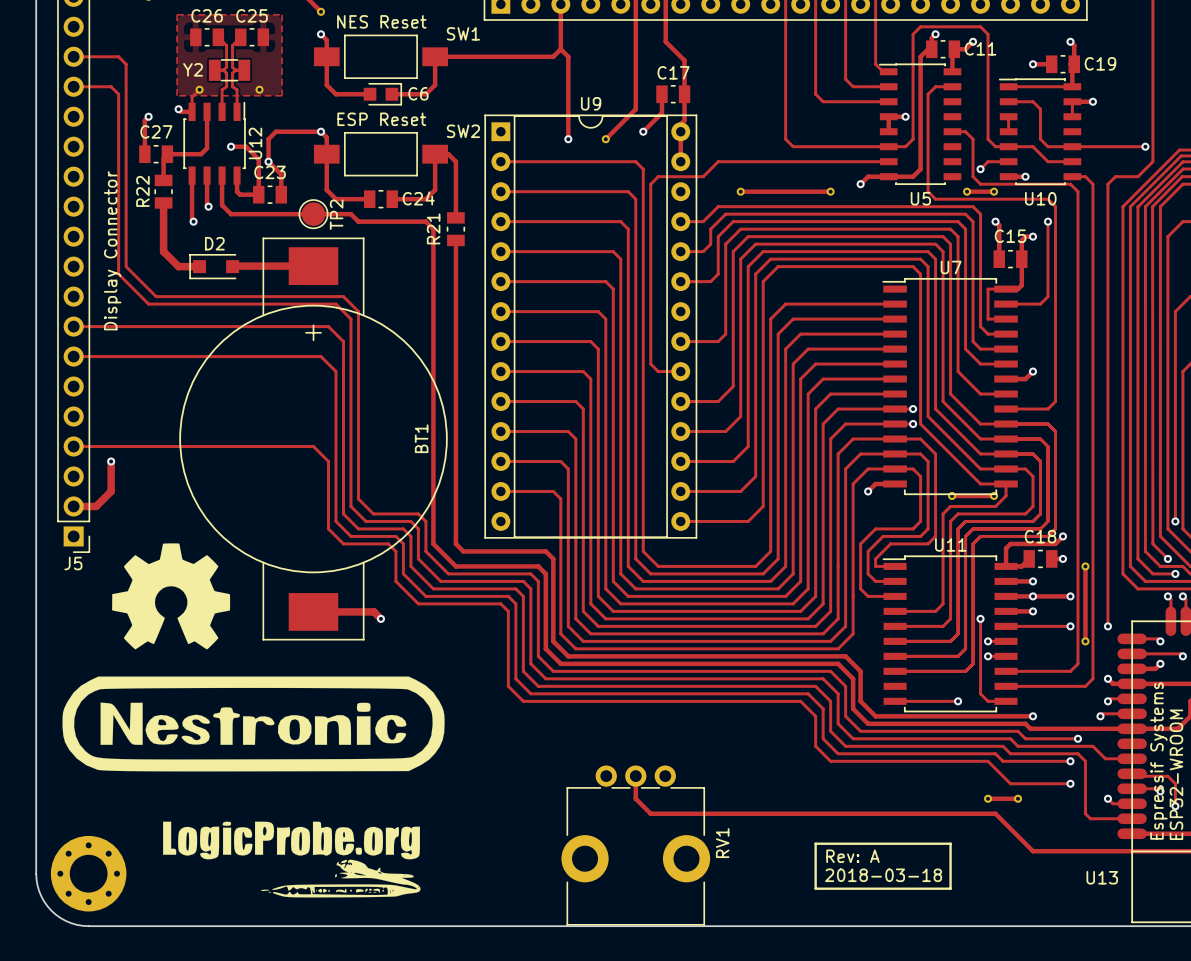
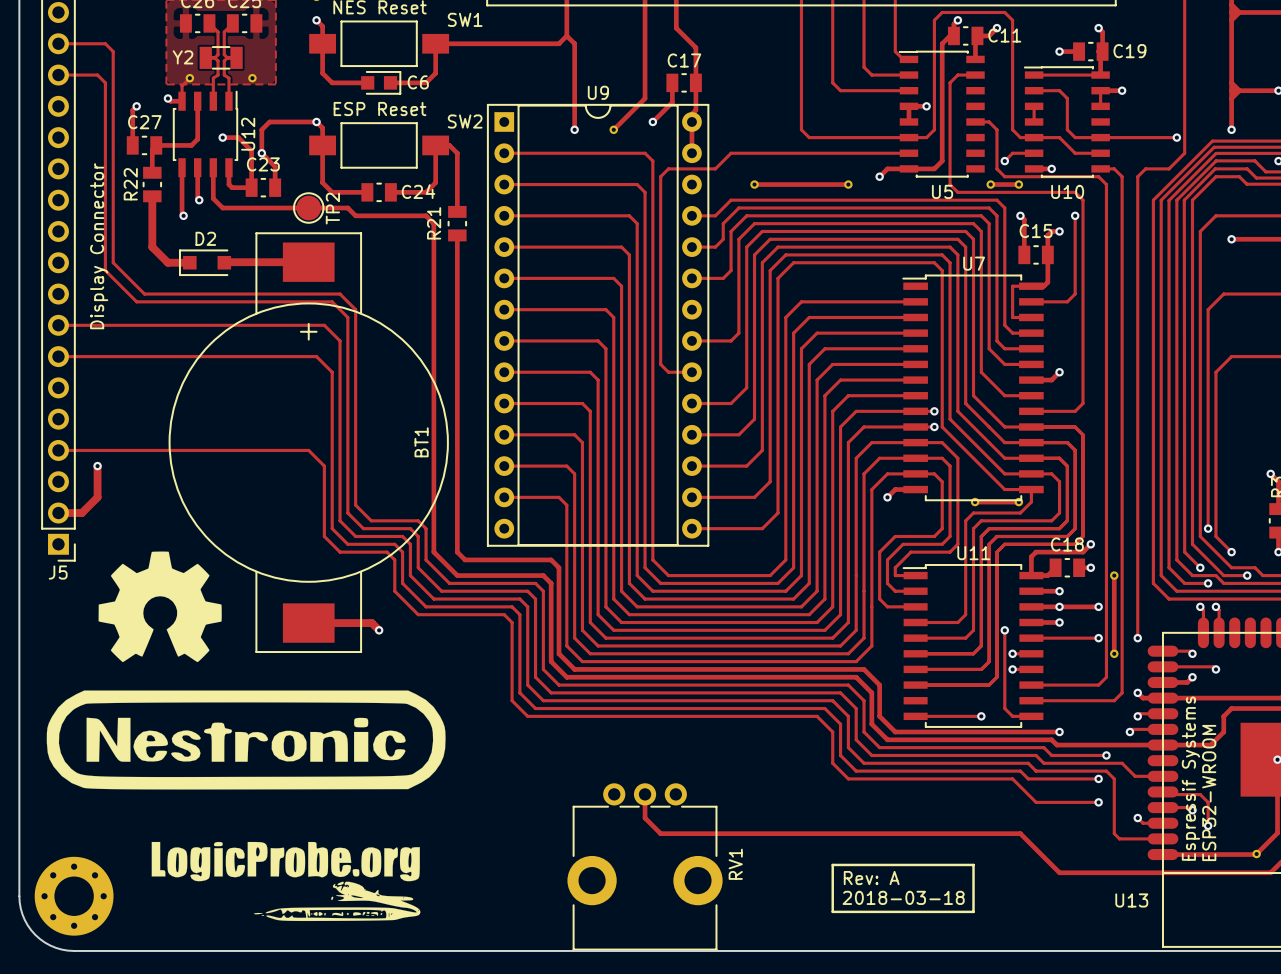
track: (988, 798) (1018, 798) -> none
part: (988, 798) -> none
part: (1018, 798) -> none

